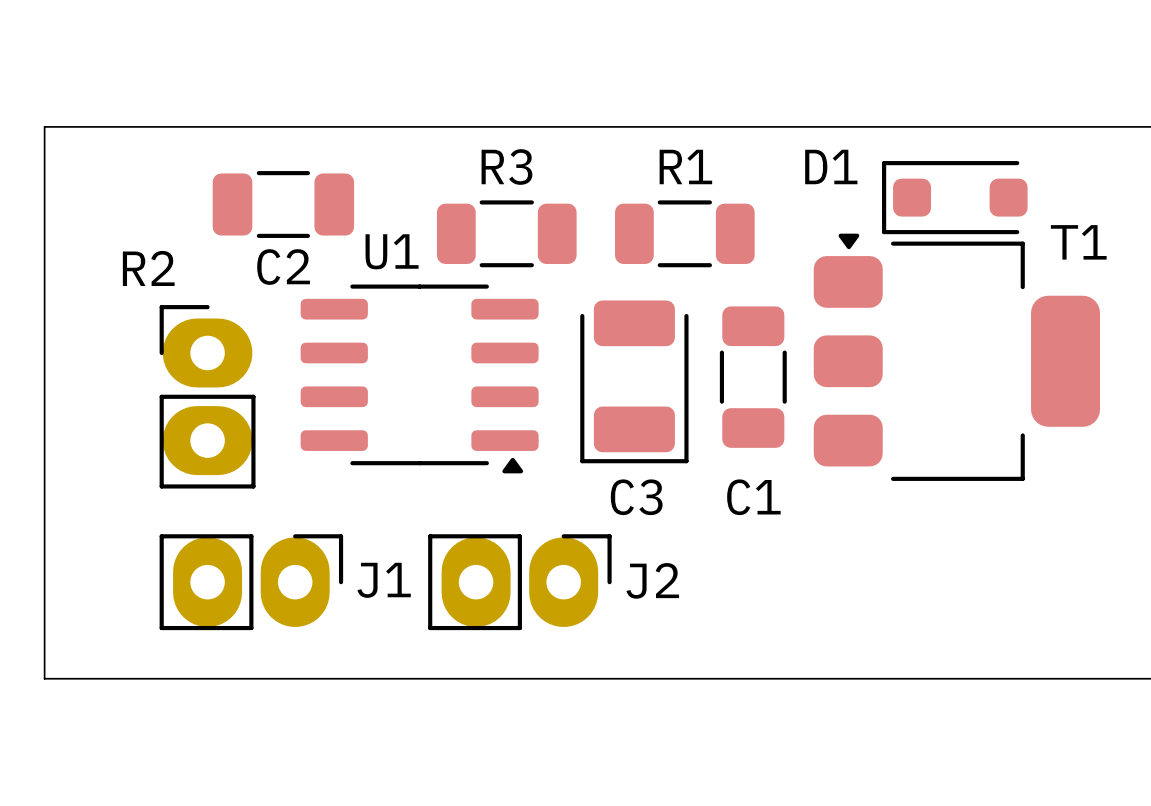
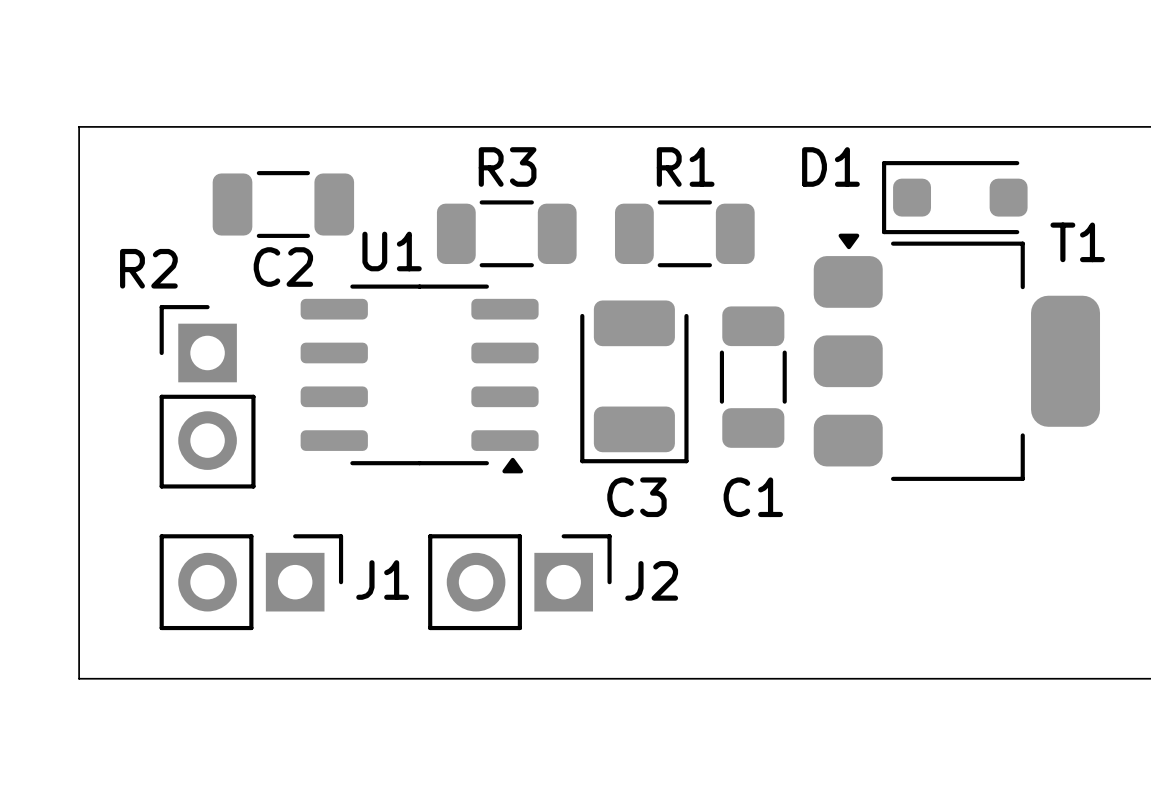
board edge: (79, 126) (44, 126) (44, 678) (79, 678) -> (79, 126) (79, 678)
R2 footprint: [159, 305, 256, 489] -> [159, 305, 256, 489]
J1 footprint: [159, 534, 344, 631] -> [159, 534, 344, 631]
J2 footprint: [428, 534, 612, 631] -> [428, 534, 612, 631]

